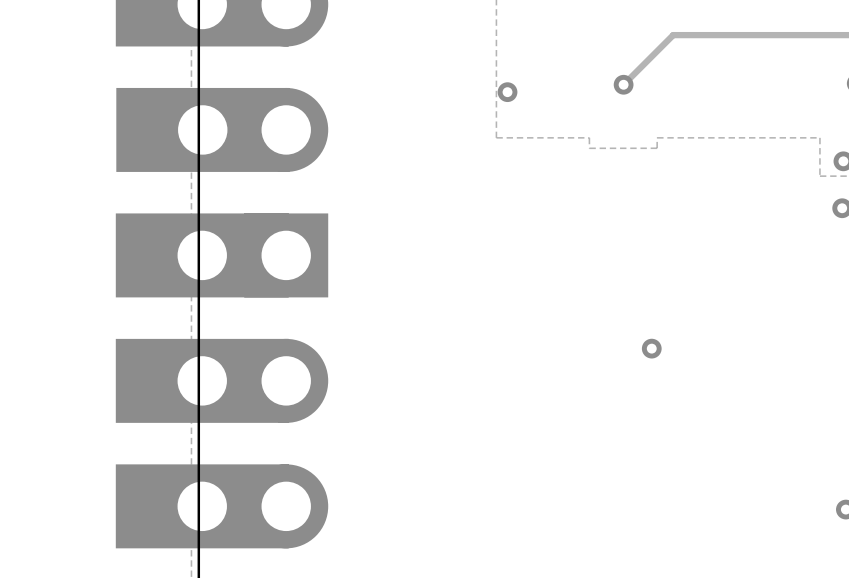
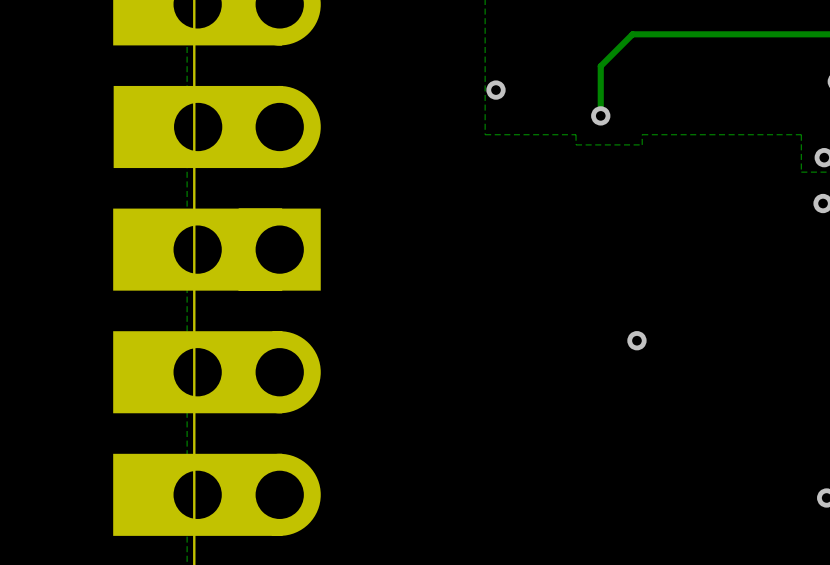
track: (673, 35) (623, 84) -> (657, 34) (632, 34) (600, 66) (600, 115)
via position: (623, 84) -> (600, 115)

